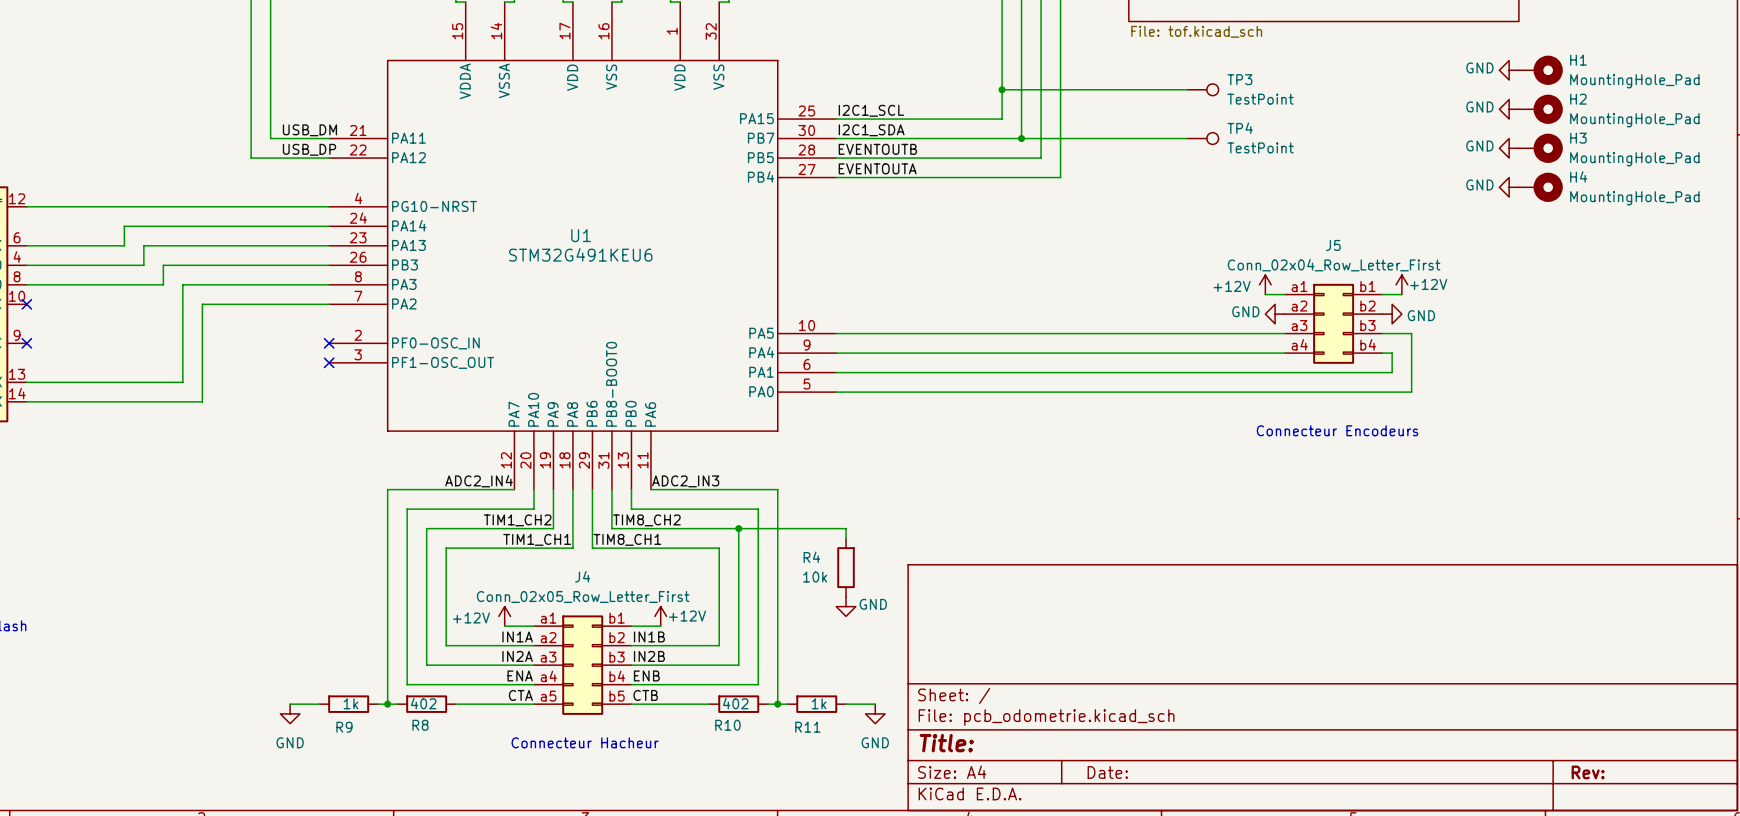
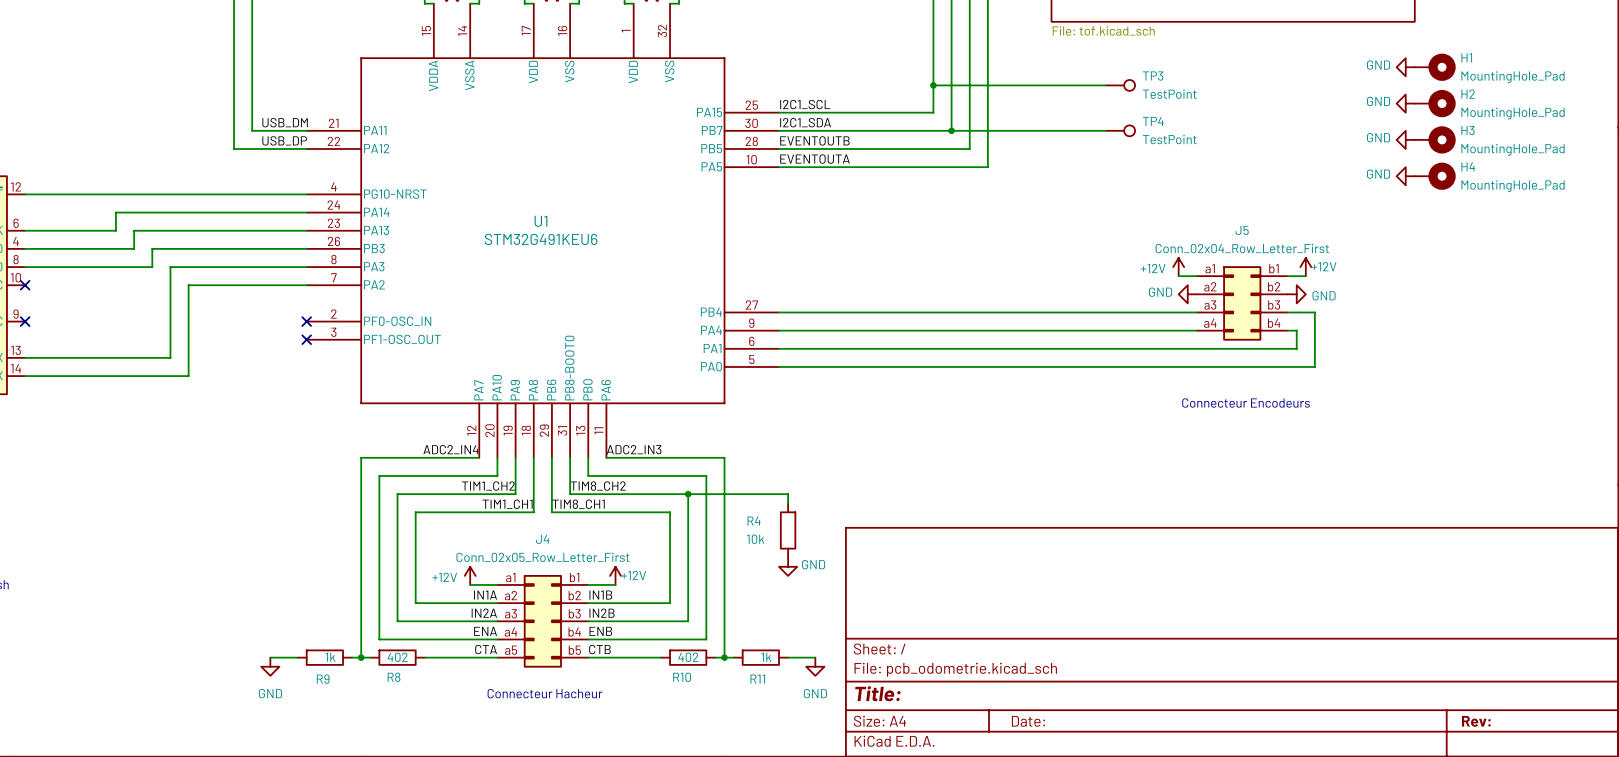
U1 pin number: 27 (807, 169) -> 10 (751, 159)
U1 pin name: PB4 (761, 176) -> PA5 (711, 166)
U1 pin number: 10 (807, 325) -> 27 (751, 304)
U1 pin name: PA5 (761, 333) -> PB4 (711, 312)

